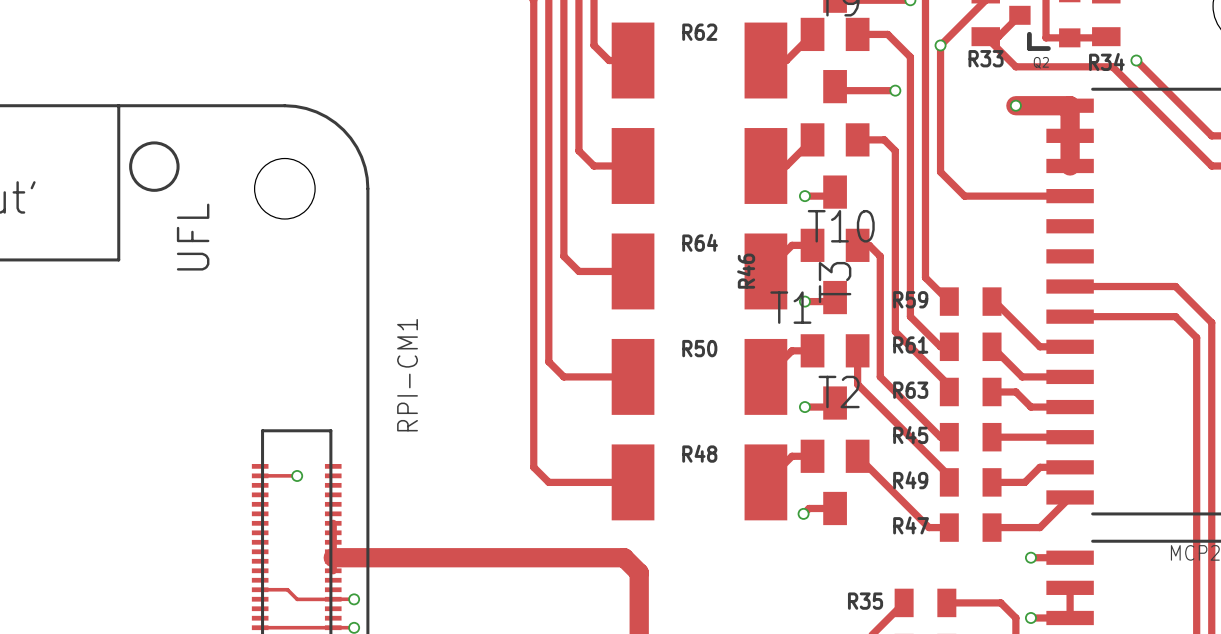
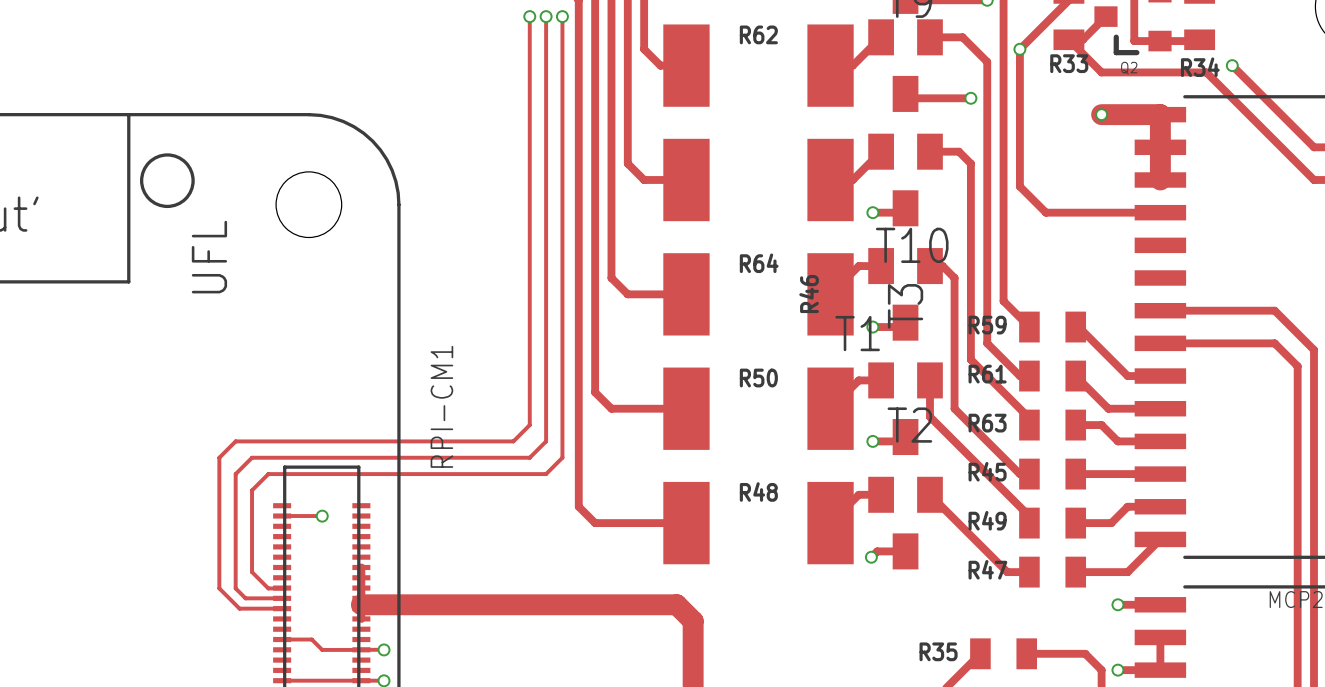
track: none -> (529, 16) (529, 425) (513, 441) (235, 441) (219, 457) (219, 588) (239, 608) (282, 608)
via: none -> (529, 16)
track: none -> (546, 16) (546, 441) (529, 457) (252, 457) (235, 474) (235, 588) (245, 598) (282, 598)
via: none -> (546, 16)
track: none -> (562, 16) (562, 457) (546, 474) (268, 474) (252, 490) (252, 572) (268, 588) (282, 588)
via: none -> (562, 16)

